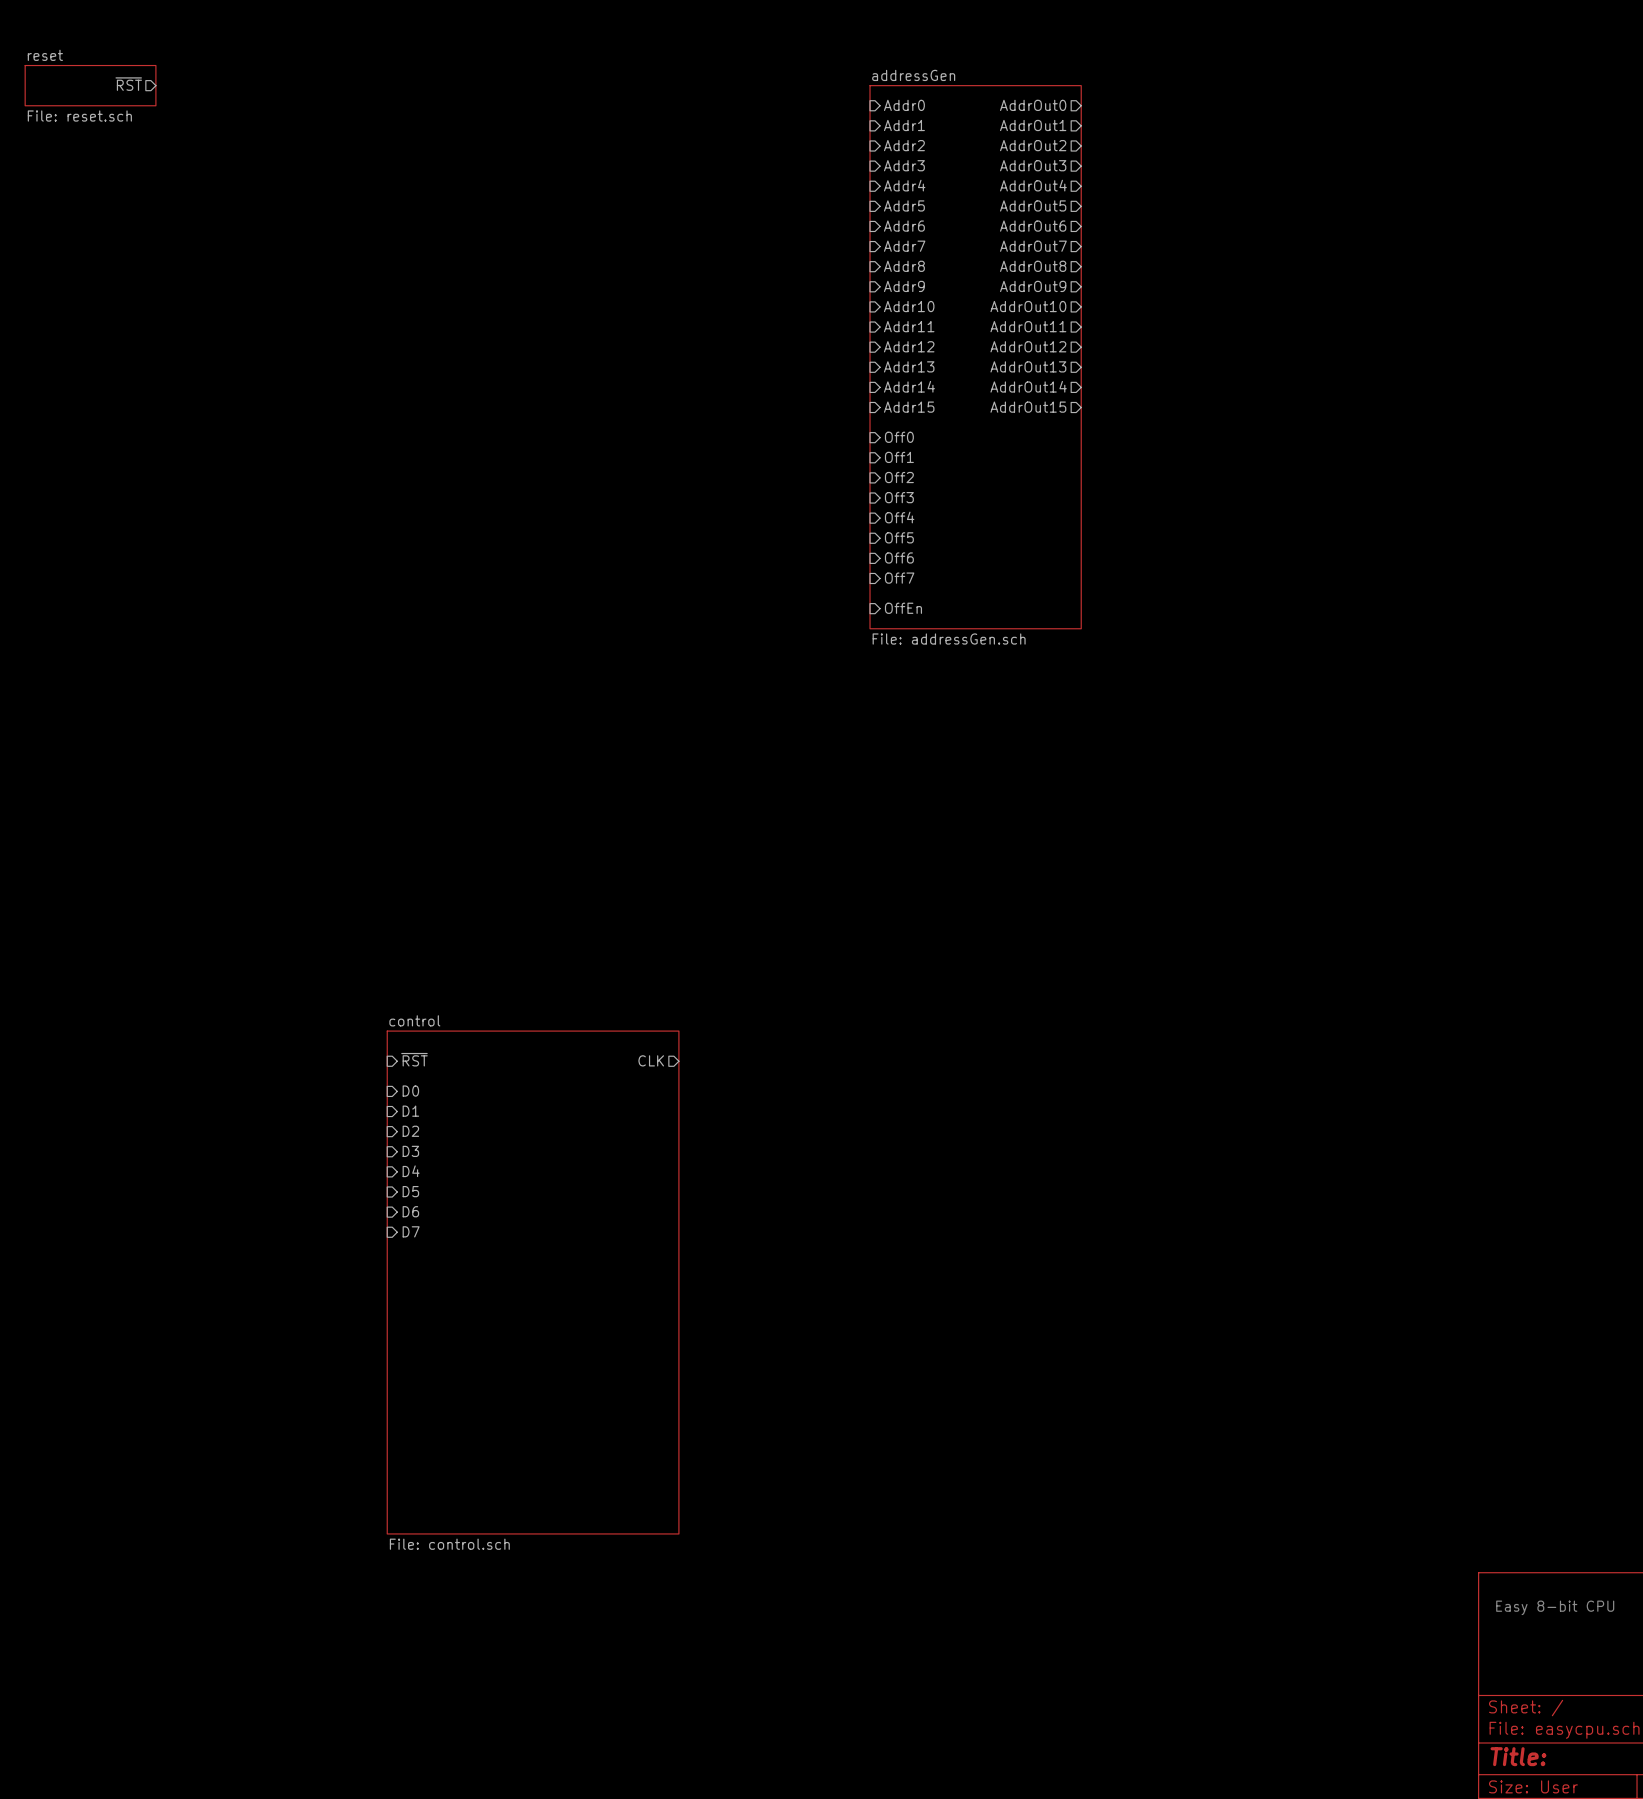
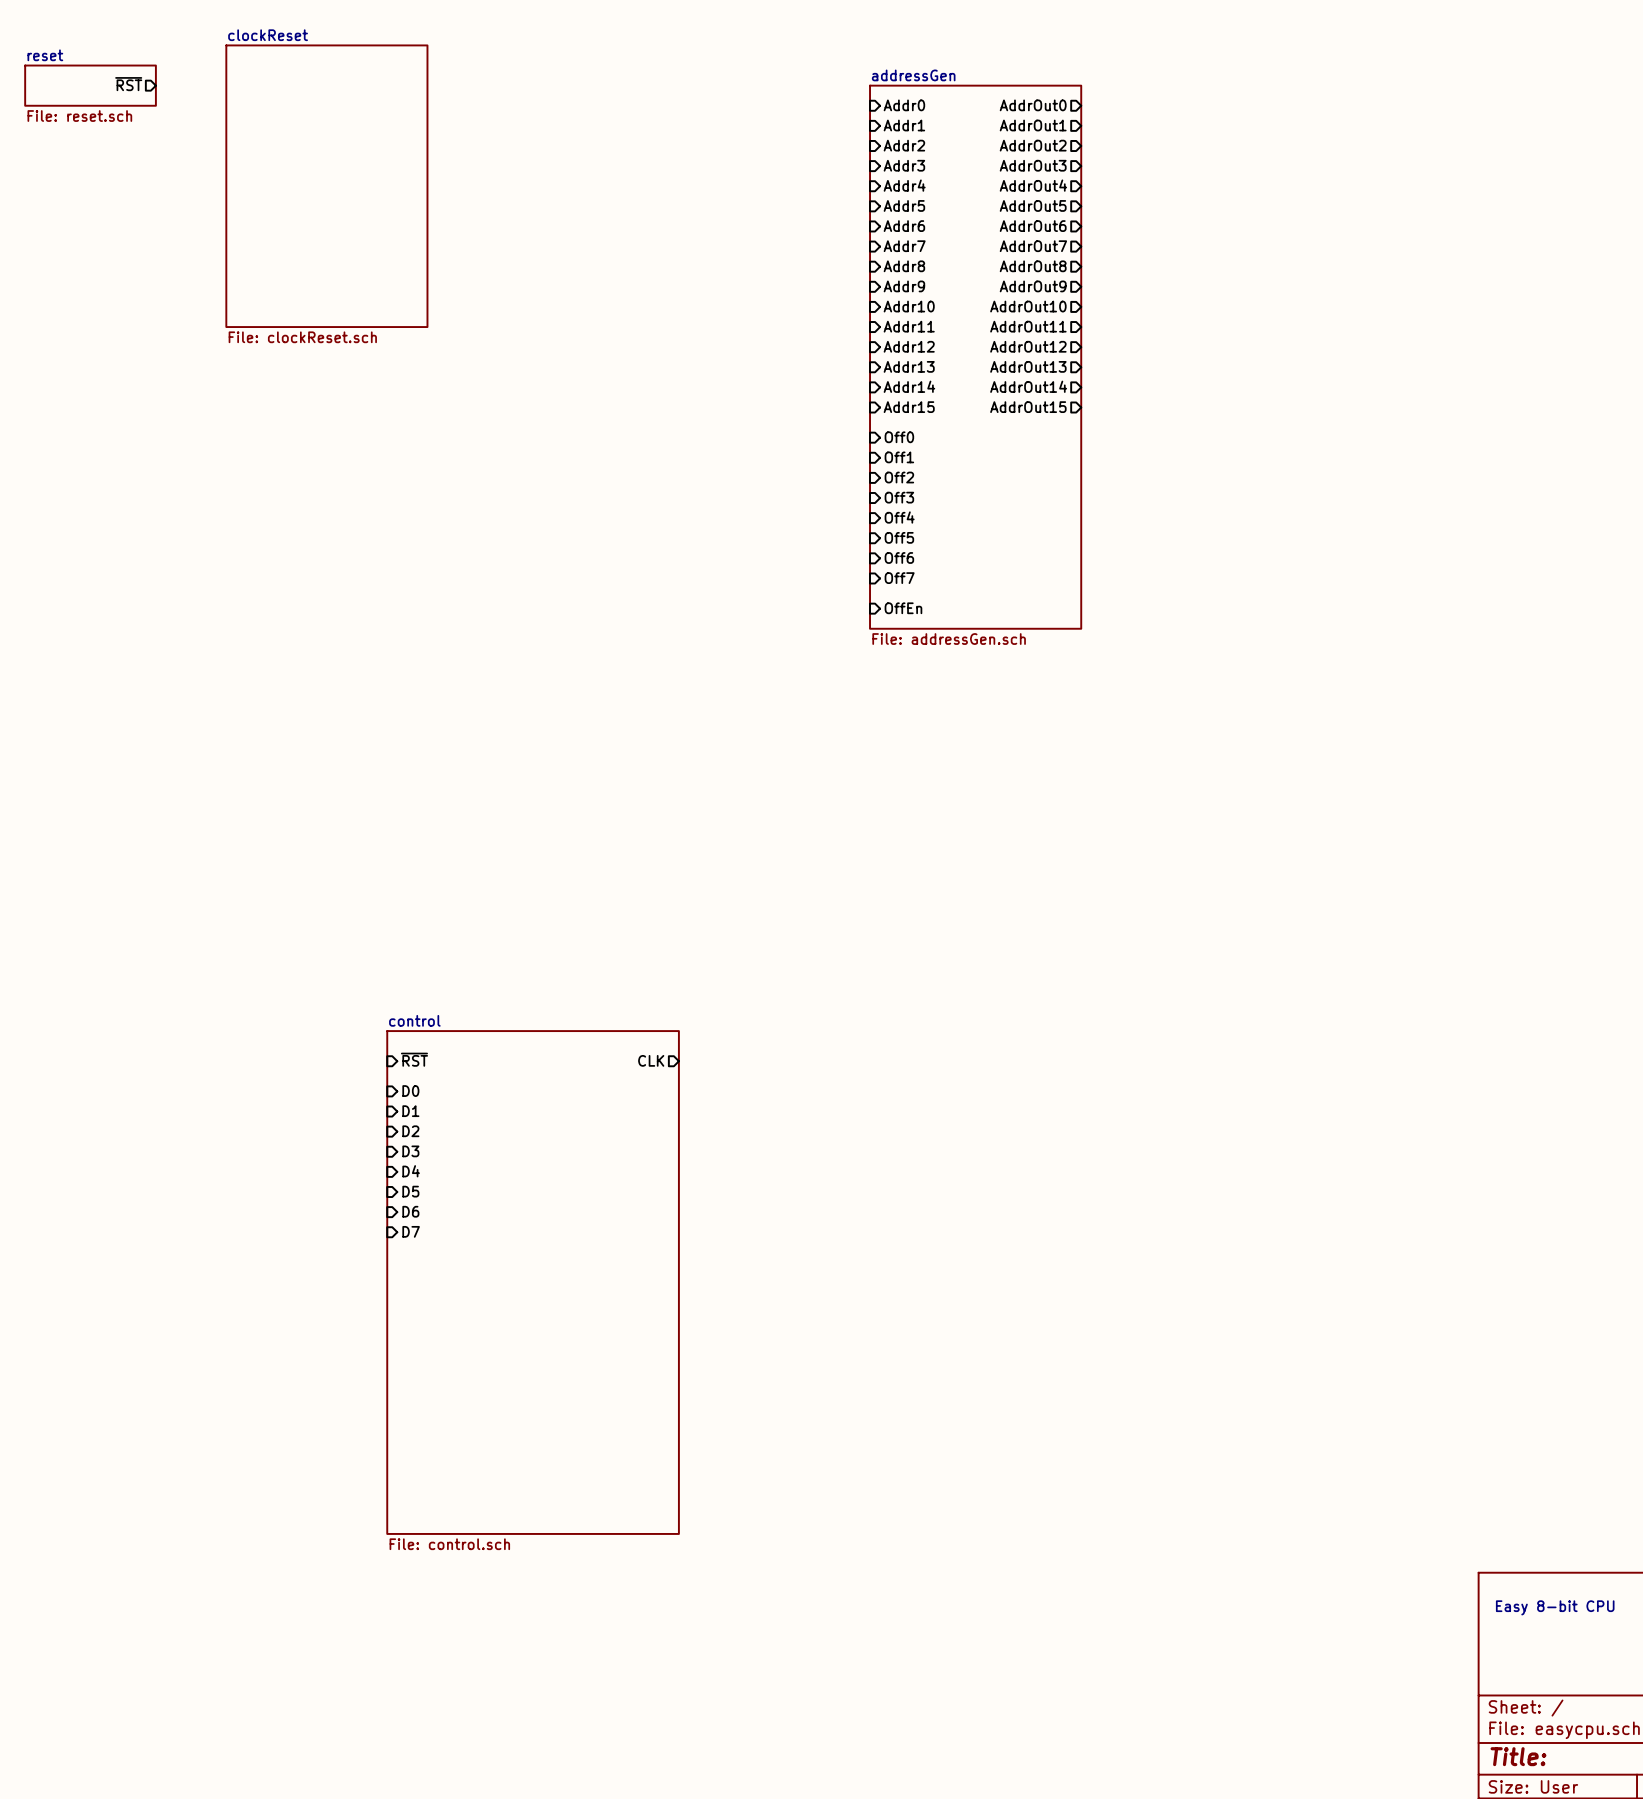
sheet clockReset: none -> File: clockReset.sch (326, 186)

